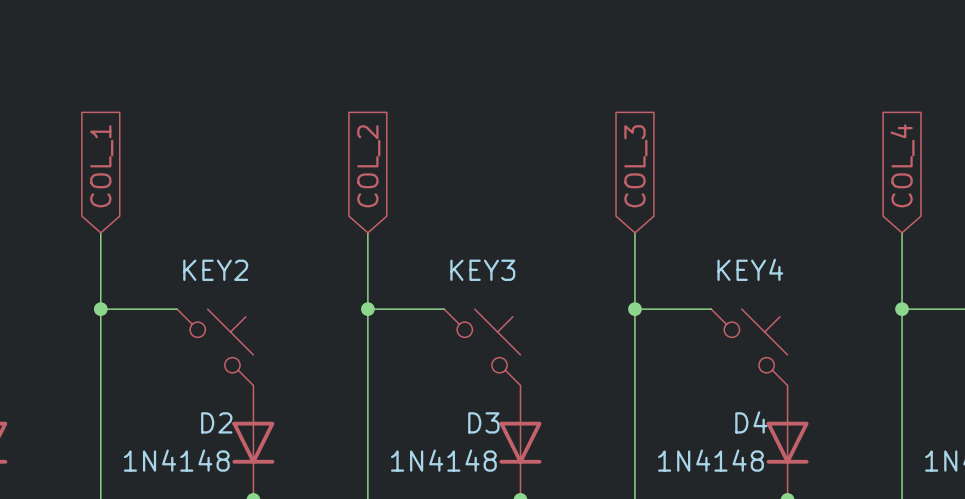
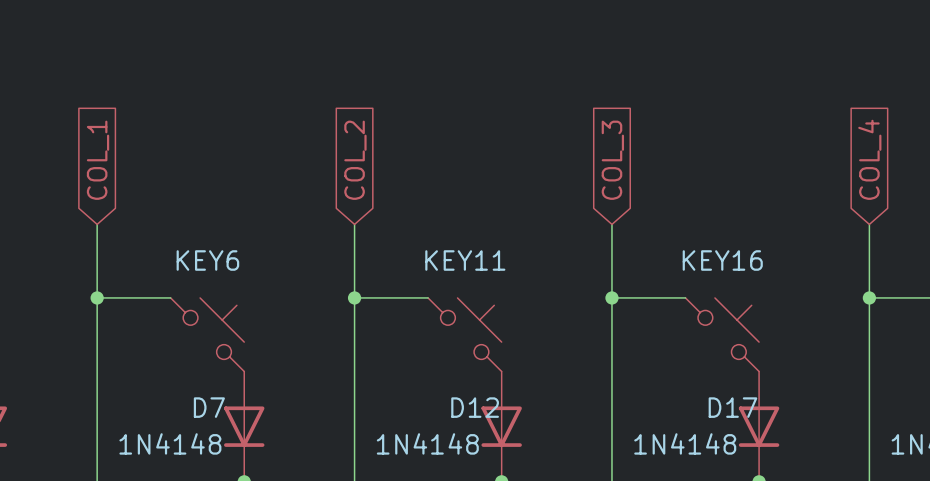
KEY4 name: KEY4 (750, 269) -> KEY16 (722, 260)
KEY2 name: KEY2 (215, 270) -> KEY6 (207, 260)
KEY3 name: KEY3 (482, 270) -> KEY11 (465, 260)
D2 name: D2 (216, 422) -> D7 (209, 407)
D3 name: D3 (483, 422) -> D12 (475, 407)
D4 name: D4 (751, 422) -> D17 (732, 407)

